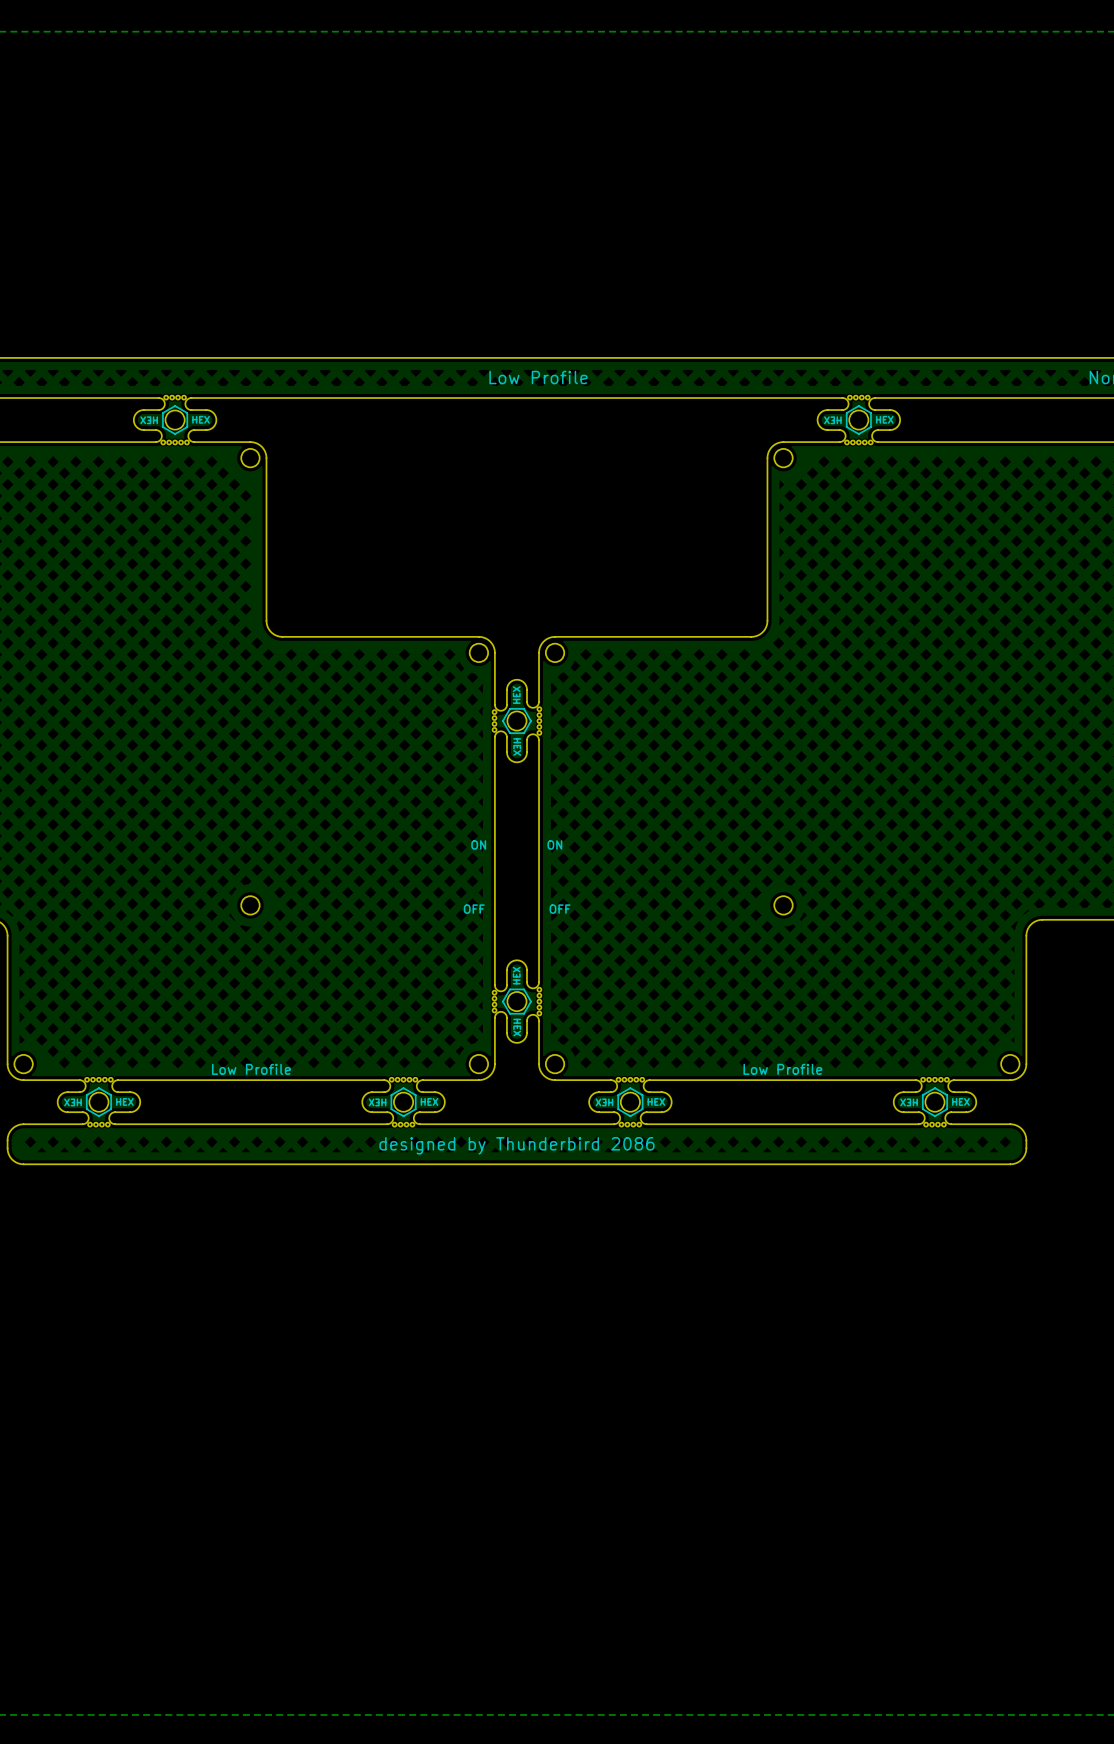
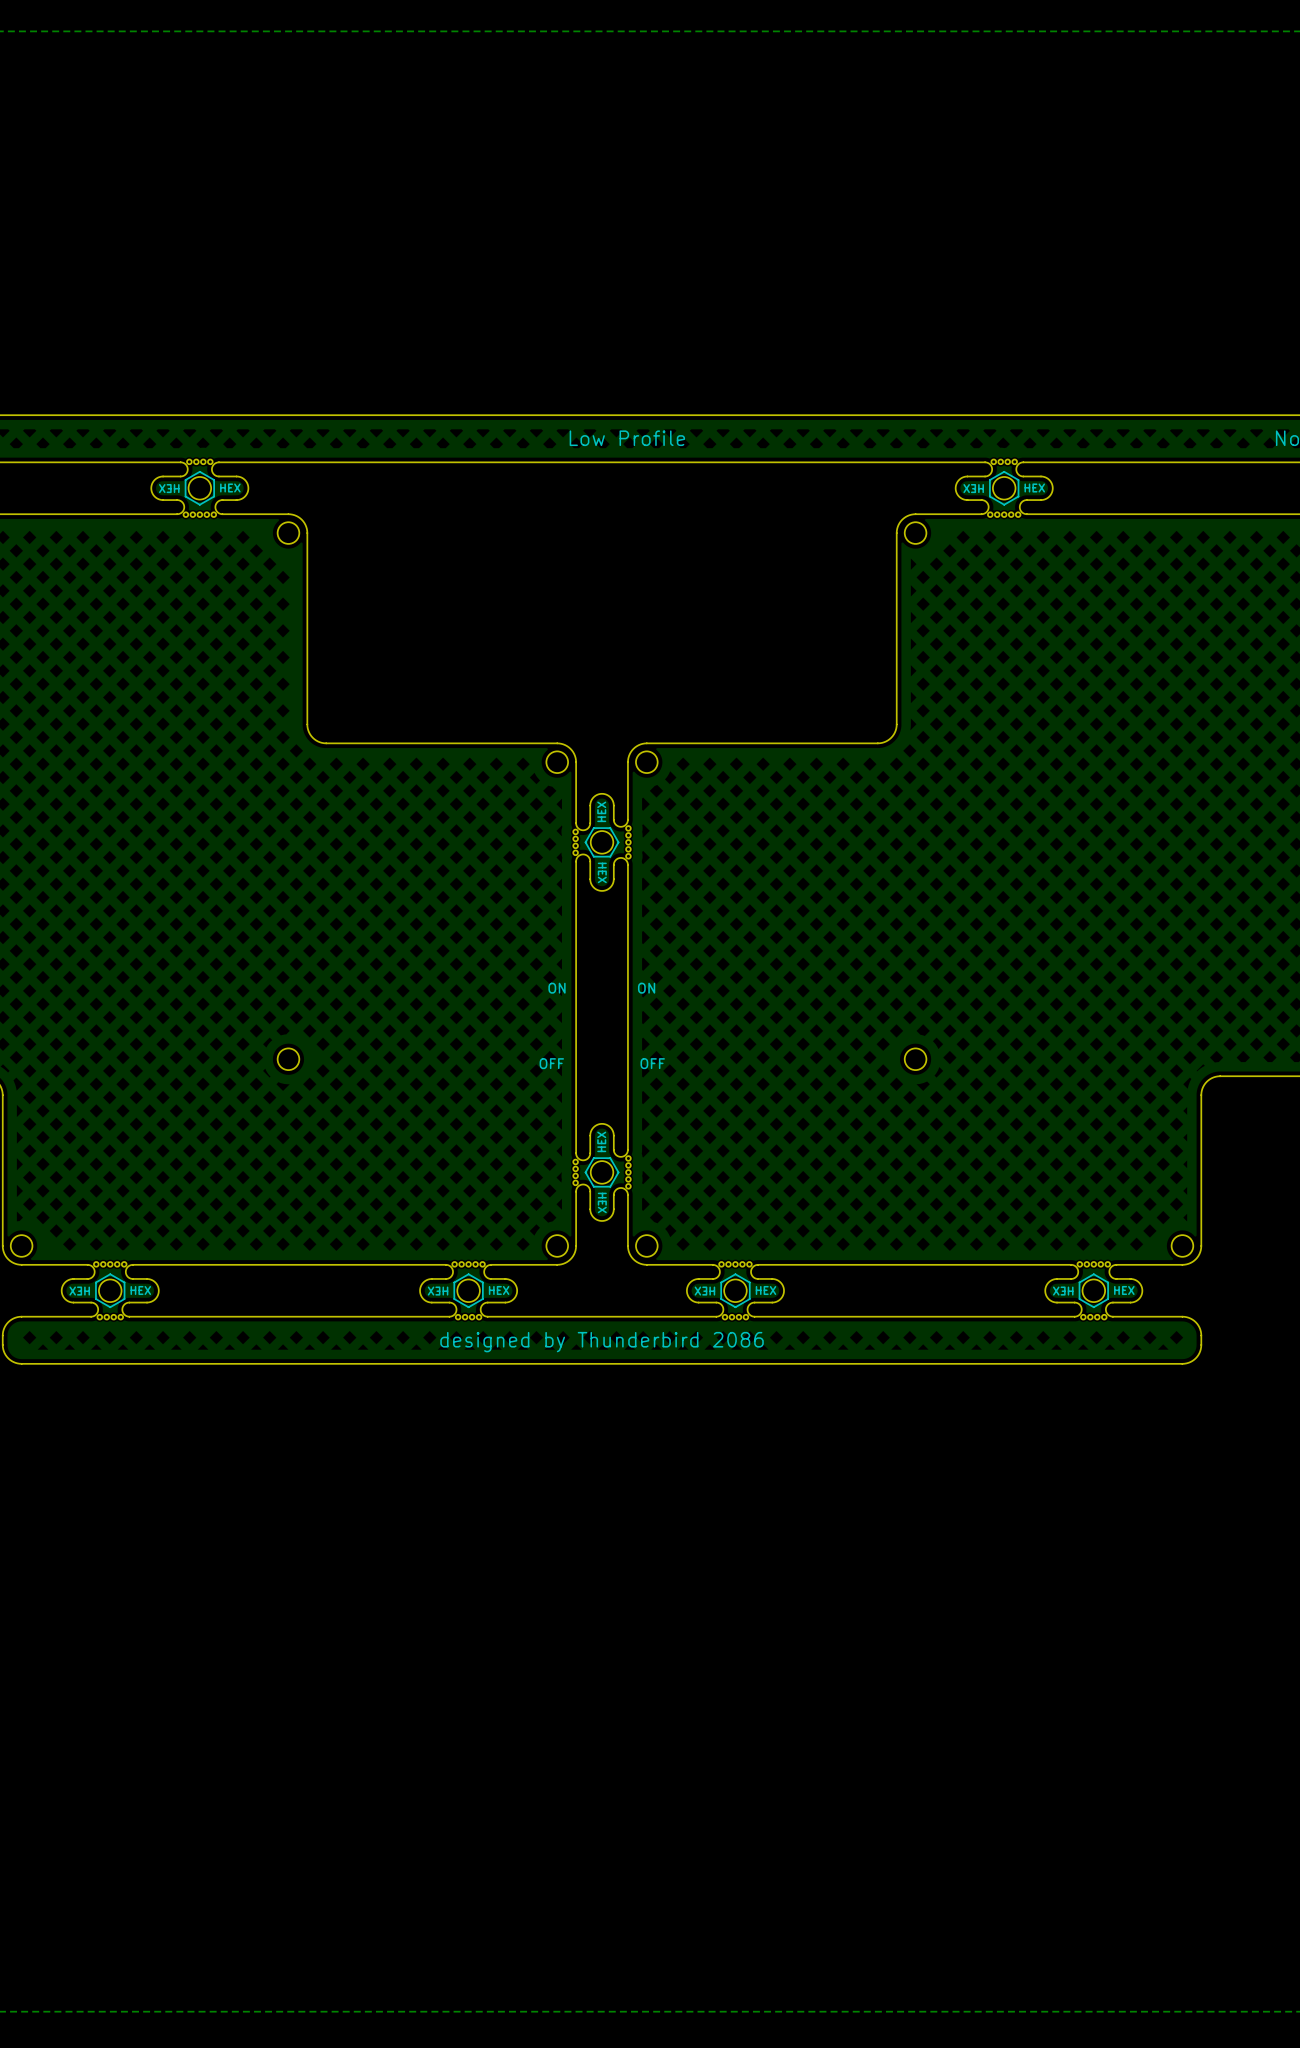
text: Low Profile (251, 1069) -> none
text: Low Profile (782, 1069) -> none

